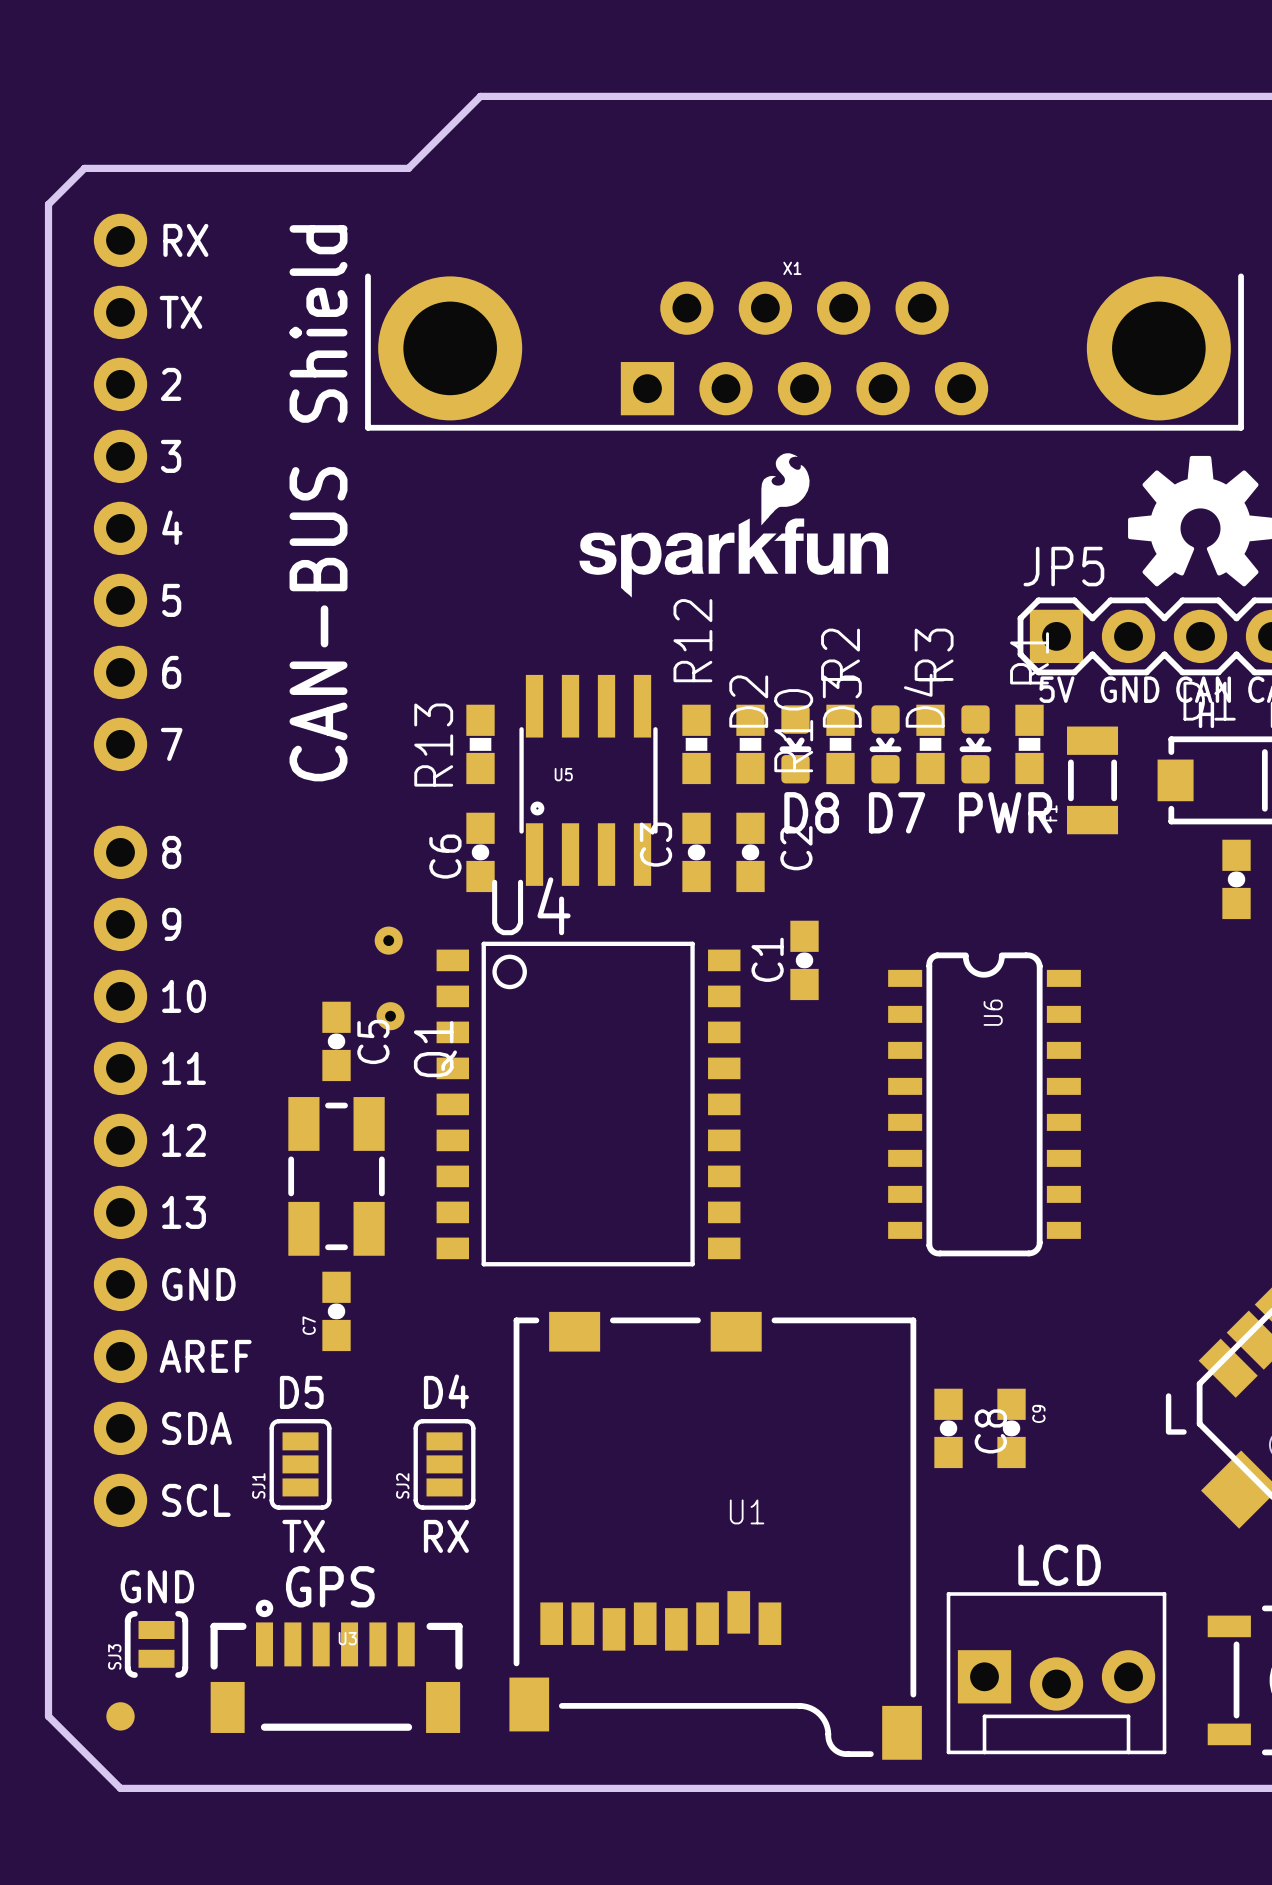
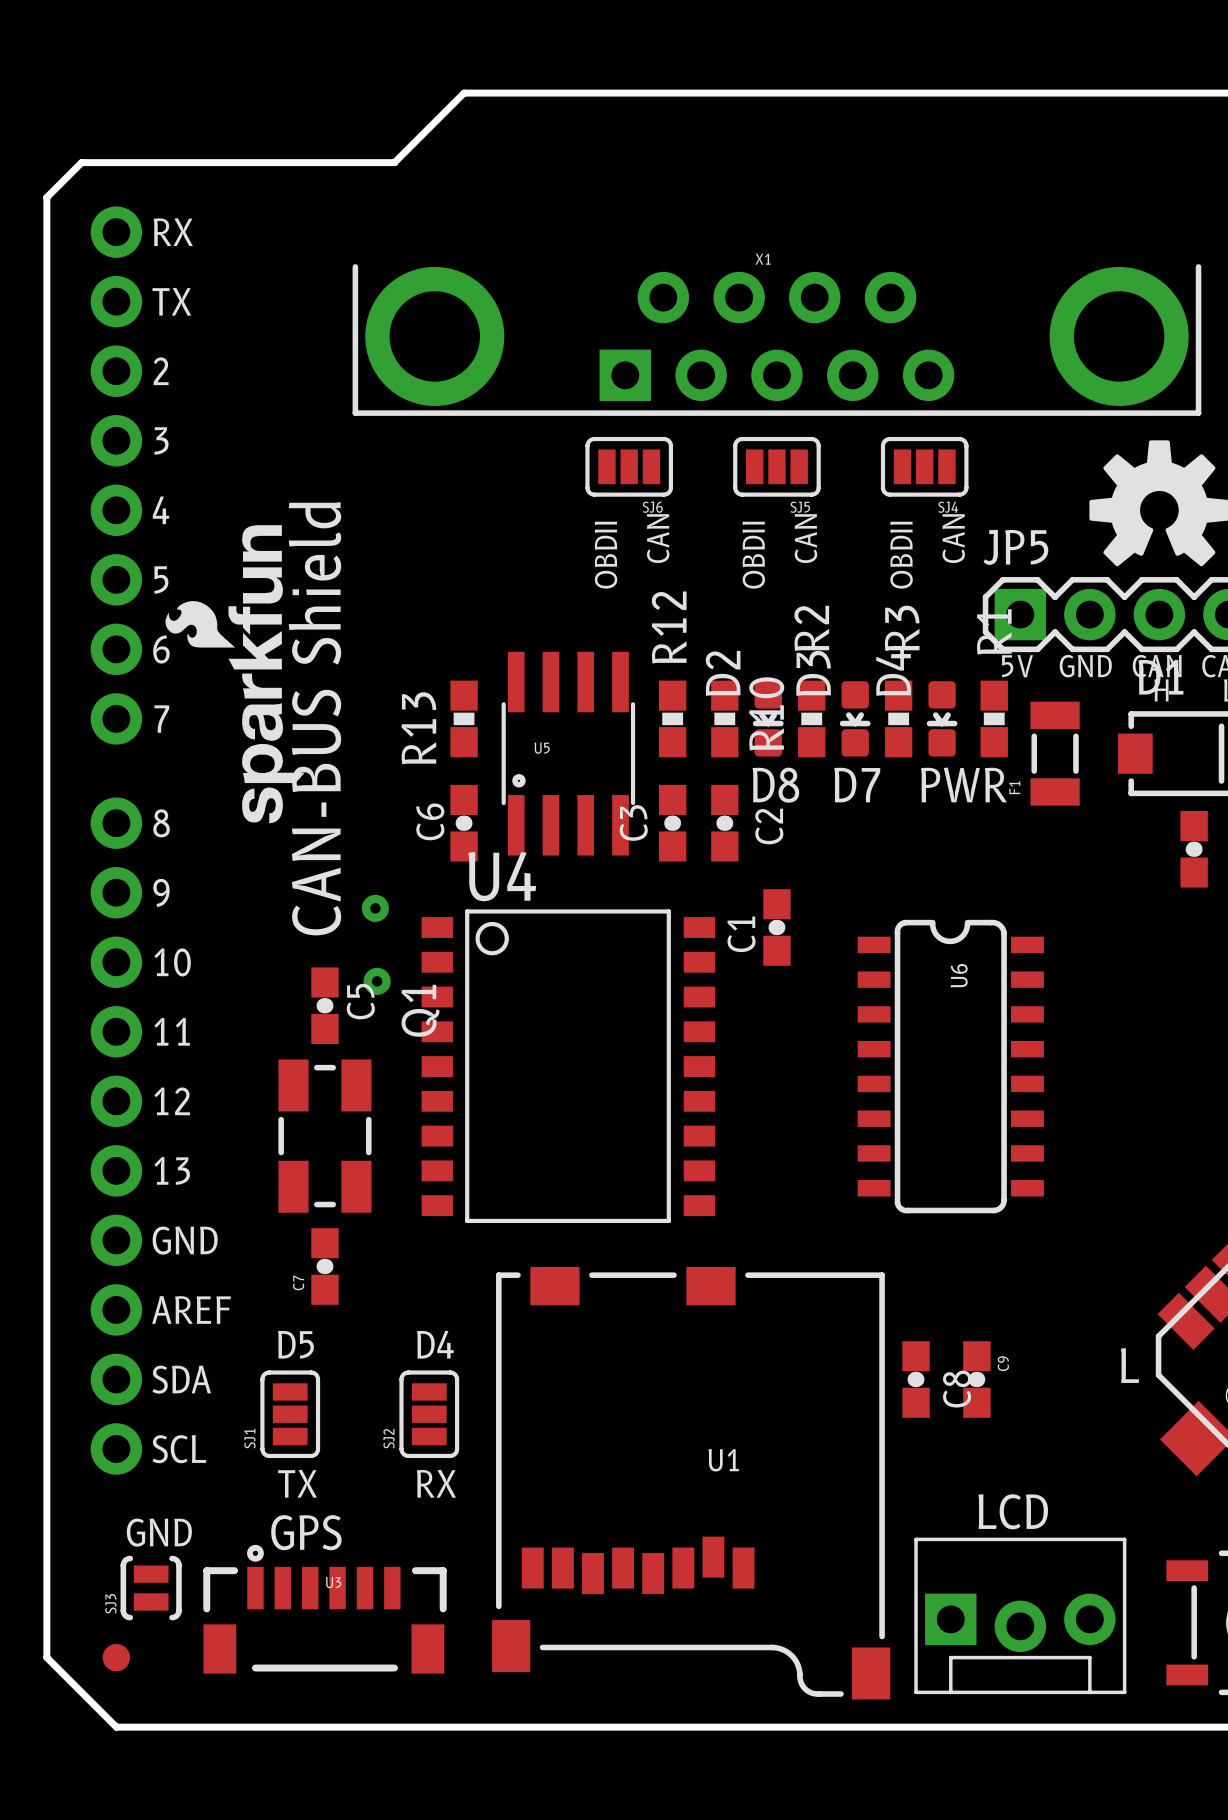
drawing: [579, 453, 889, 598] -> none
SJ6: none -> (629, 466)
SJ5: none -> (776, 466)
SJ4: none -> (924, 466)
text position: CAN-BUS Shield (318, 503) -> CAN-BUS Shield (314, 718)
drawing: none -> [165, 525, 305, 824]
text: none -> CAN (658, 538)
text: none -> CAN (805, 538)
text: none -> CAN (953, 538)
text: none -> OBDII (606, 555)
text: none -> OBDII (753, 555)
text: none -> OBDII (901, 555)

